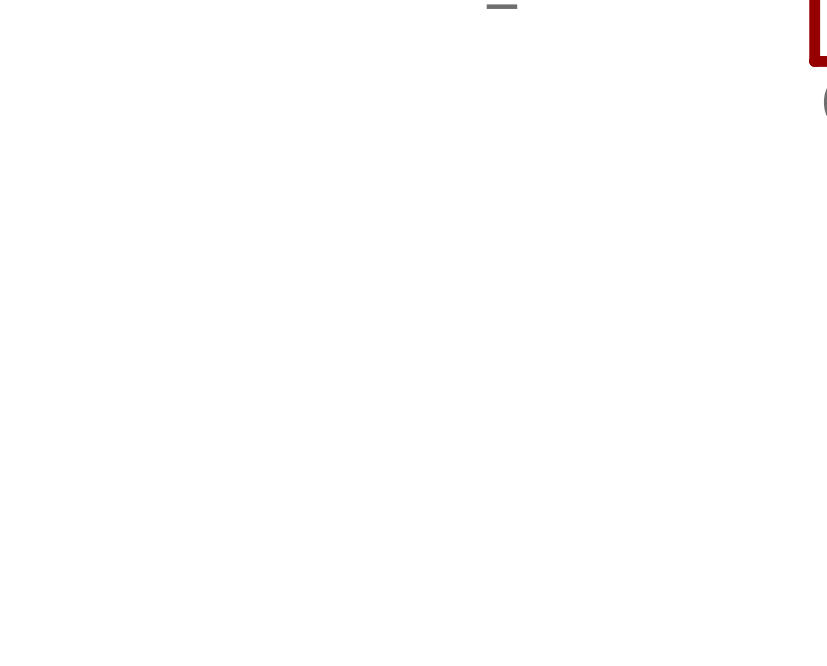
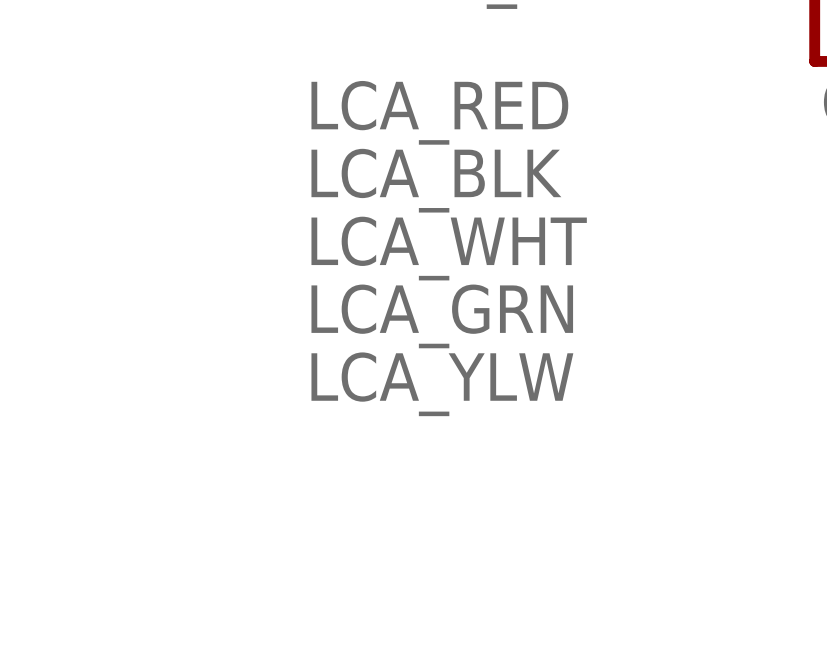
label: none -> LCA_RED (439, 112)
label: none -> LCA_BLK (436, 180)
label: none -> LCA_WHT (449, 248)
label: none -> LCA_GRN (442, 316)
label: none -> LCA_YLW (442, 384)

